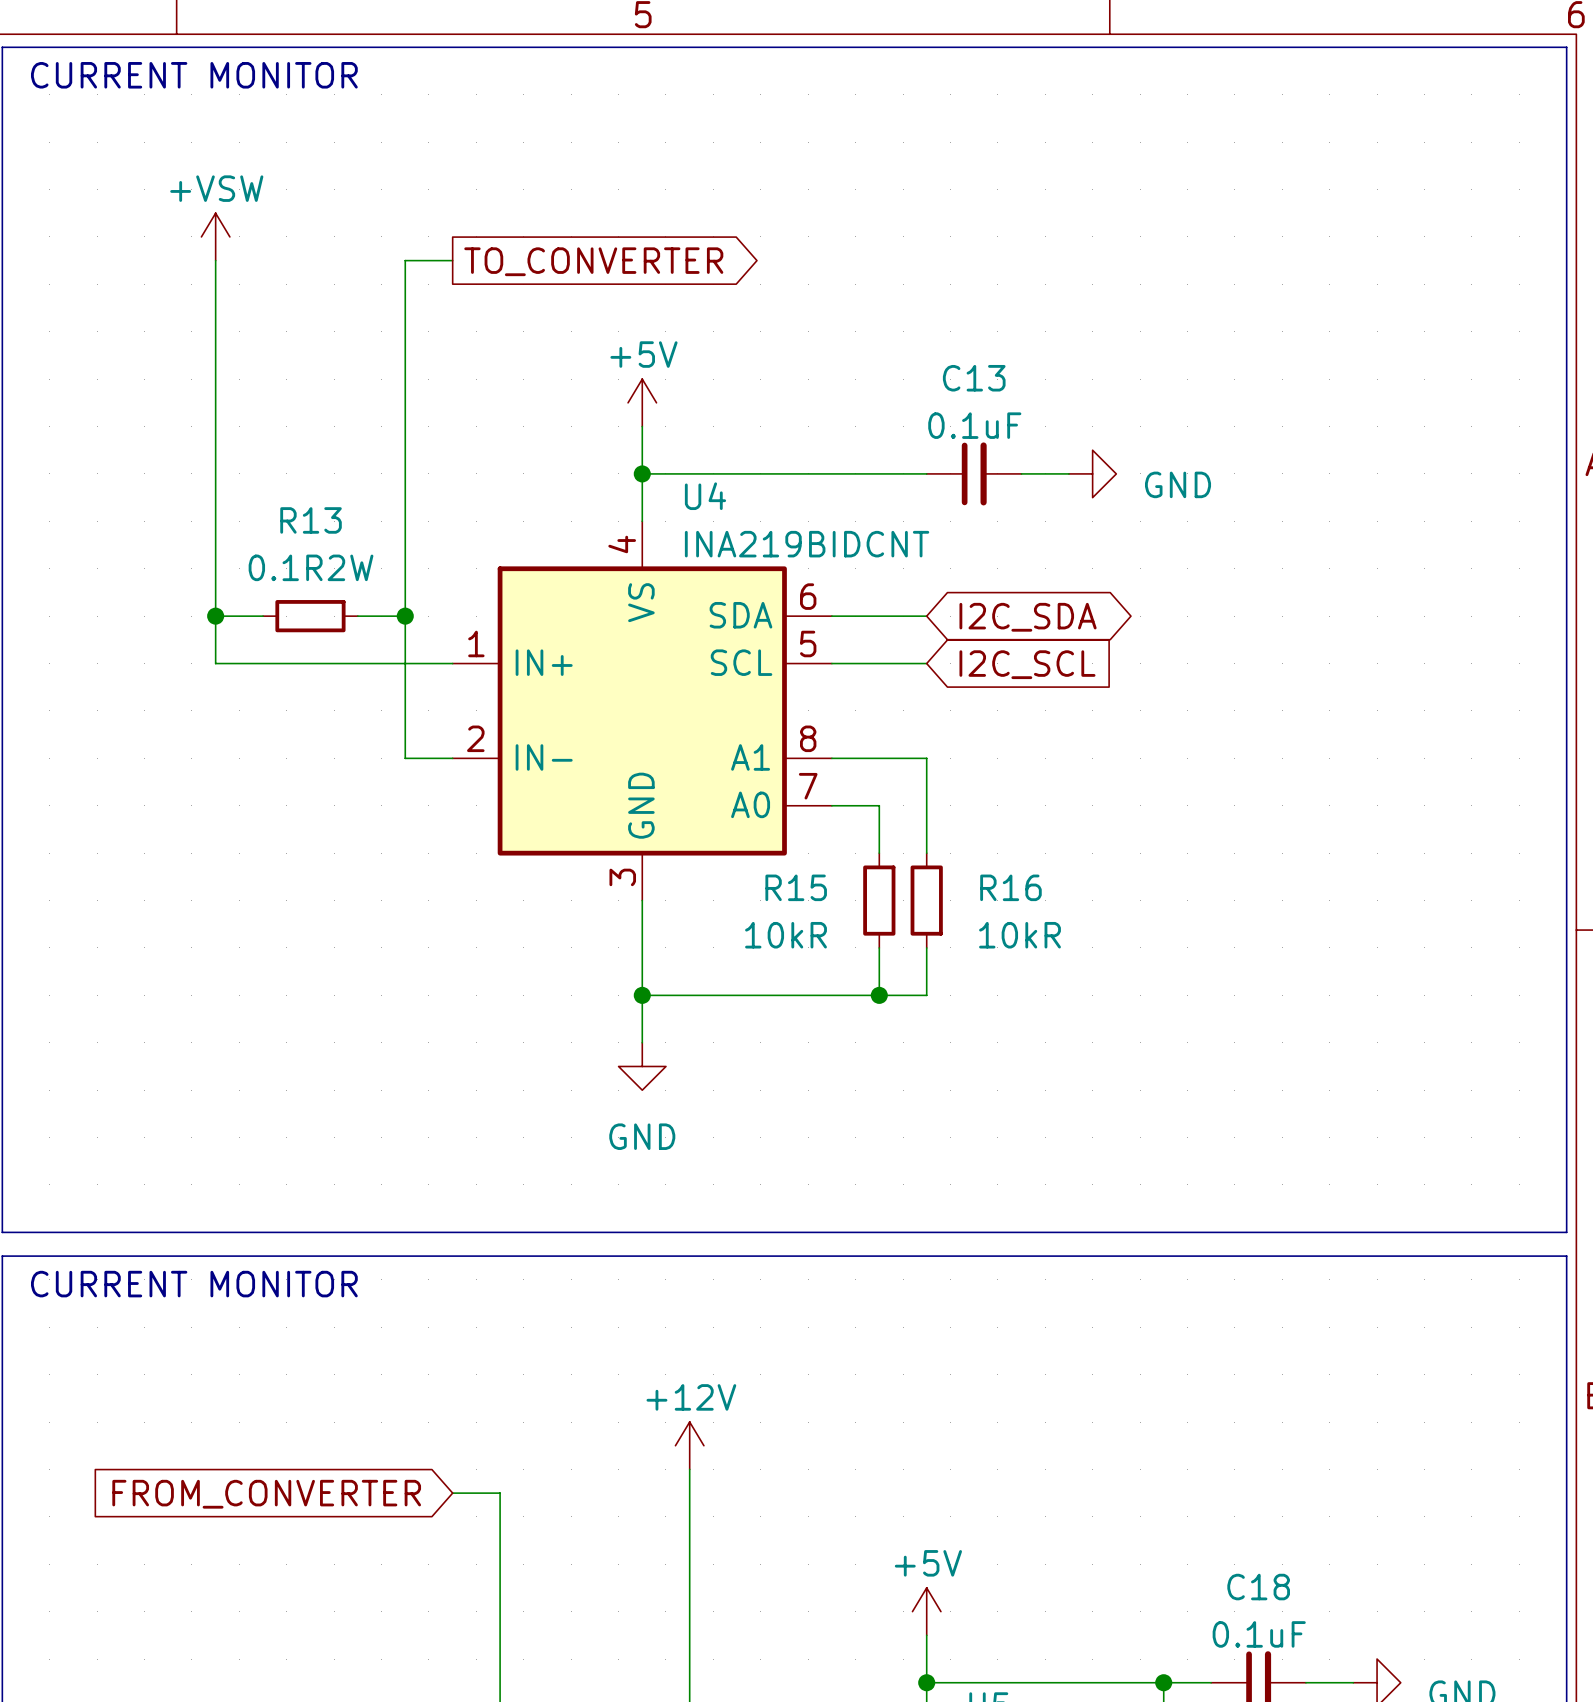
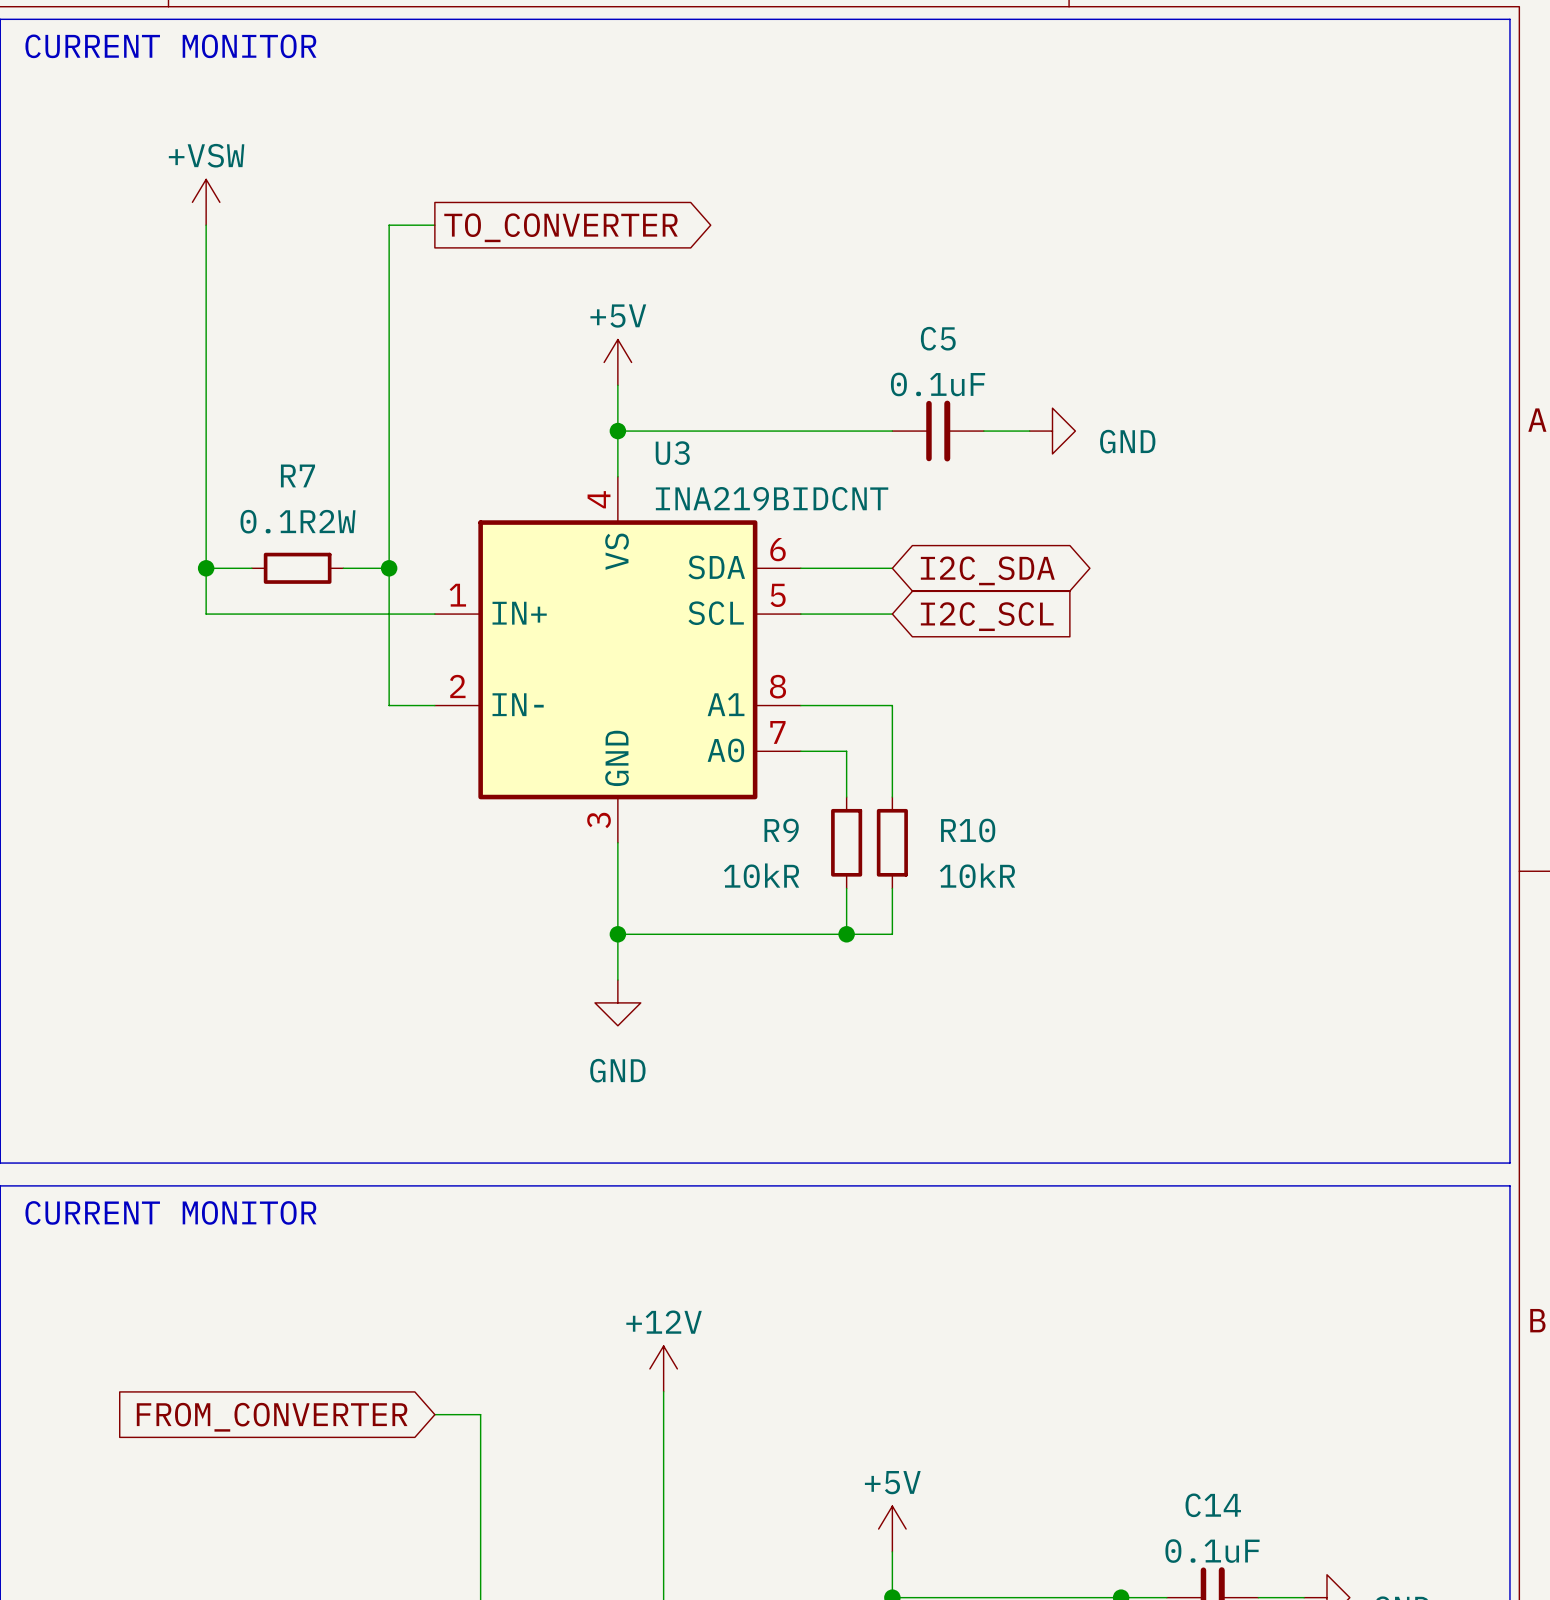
C13 name: C13 (974, 378) -> C5 (938, 338)
U4 name: U4 (705, 496) -> U3 (672, 453)
R13 name: R13 (311, 520) -> R7 (297, 475)
R15 name: R15 (796, 887) -> R9 (781, 830)
R16 name: R16 (1010, 887) -> R10 (968, 830)
C18 name: C18 (1258, 1587) -> C14 (1213, 1505)

